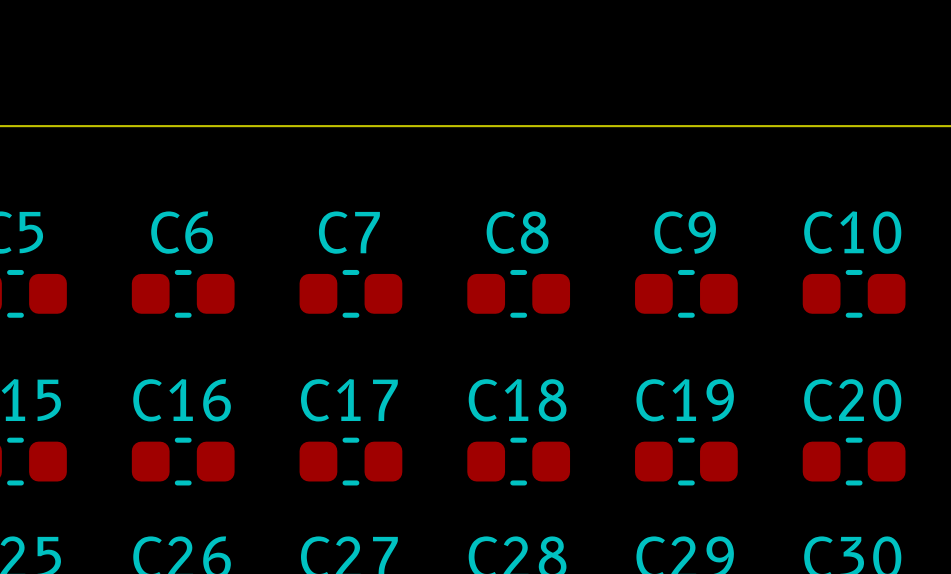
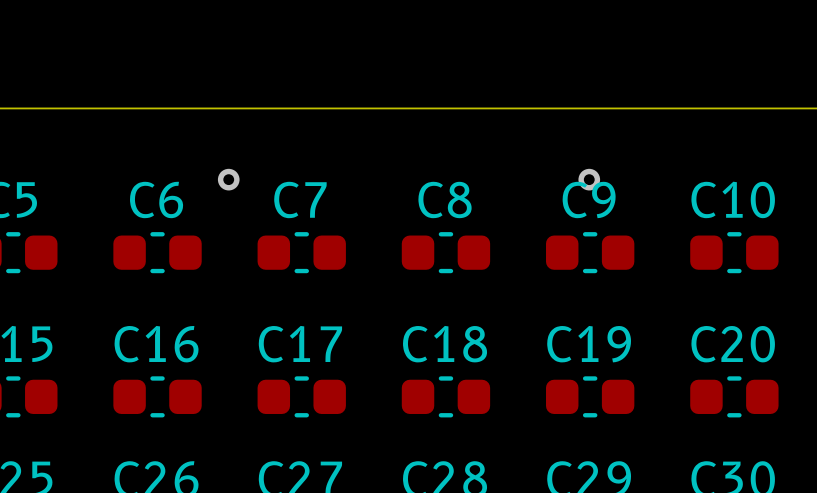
via: none -> (228, 179)
via: none -> (589, 179)

